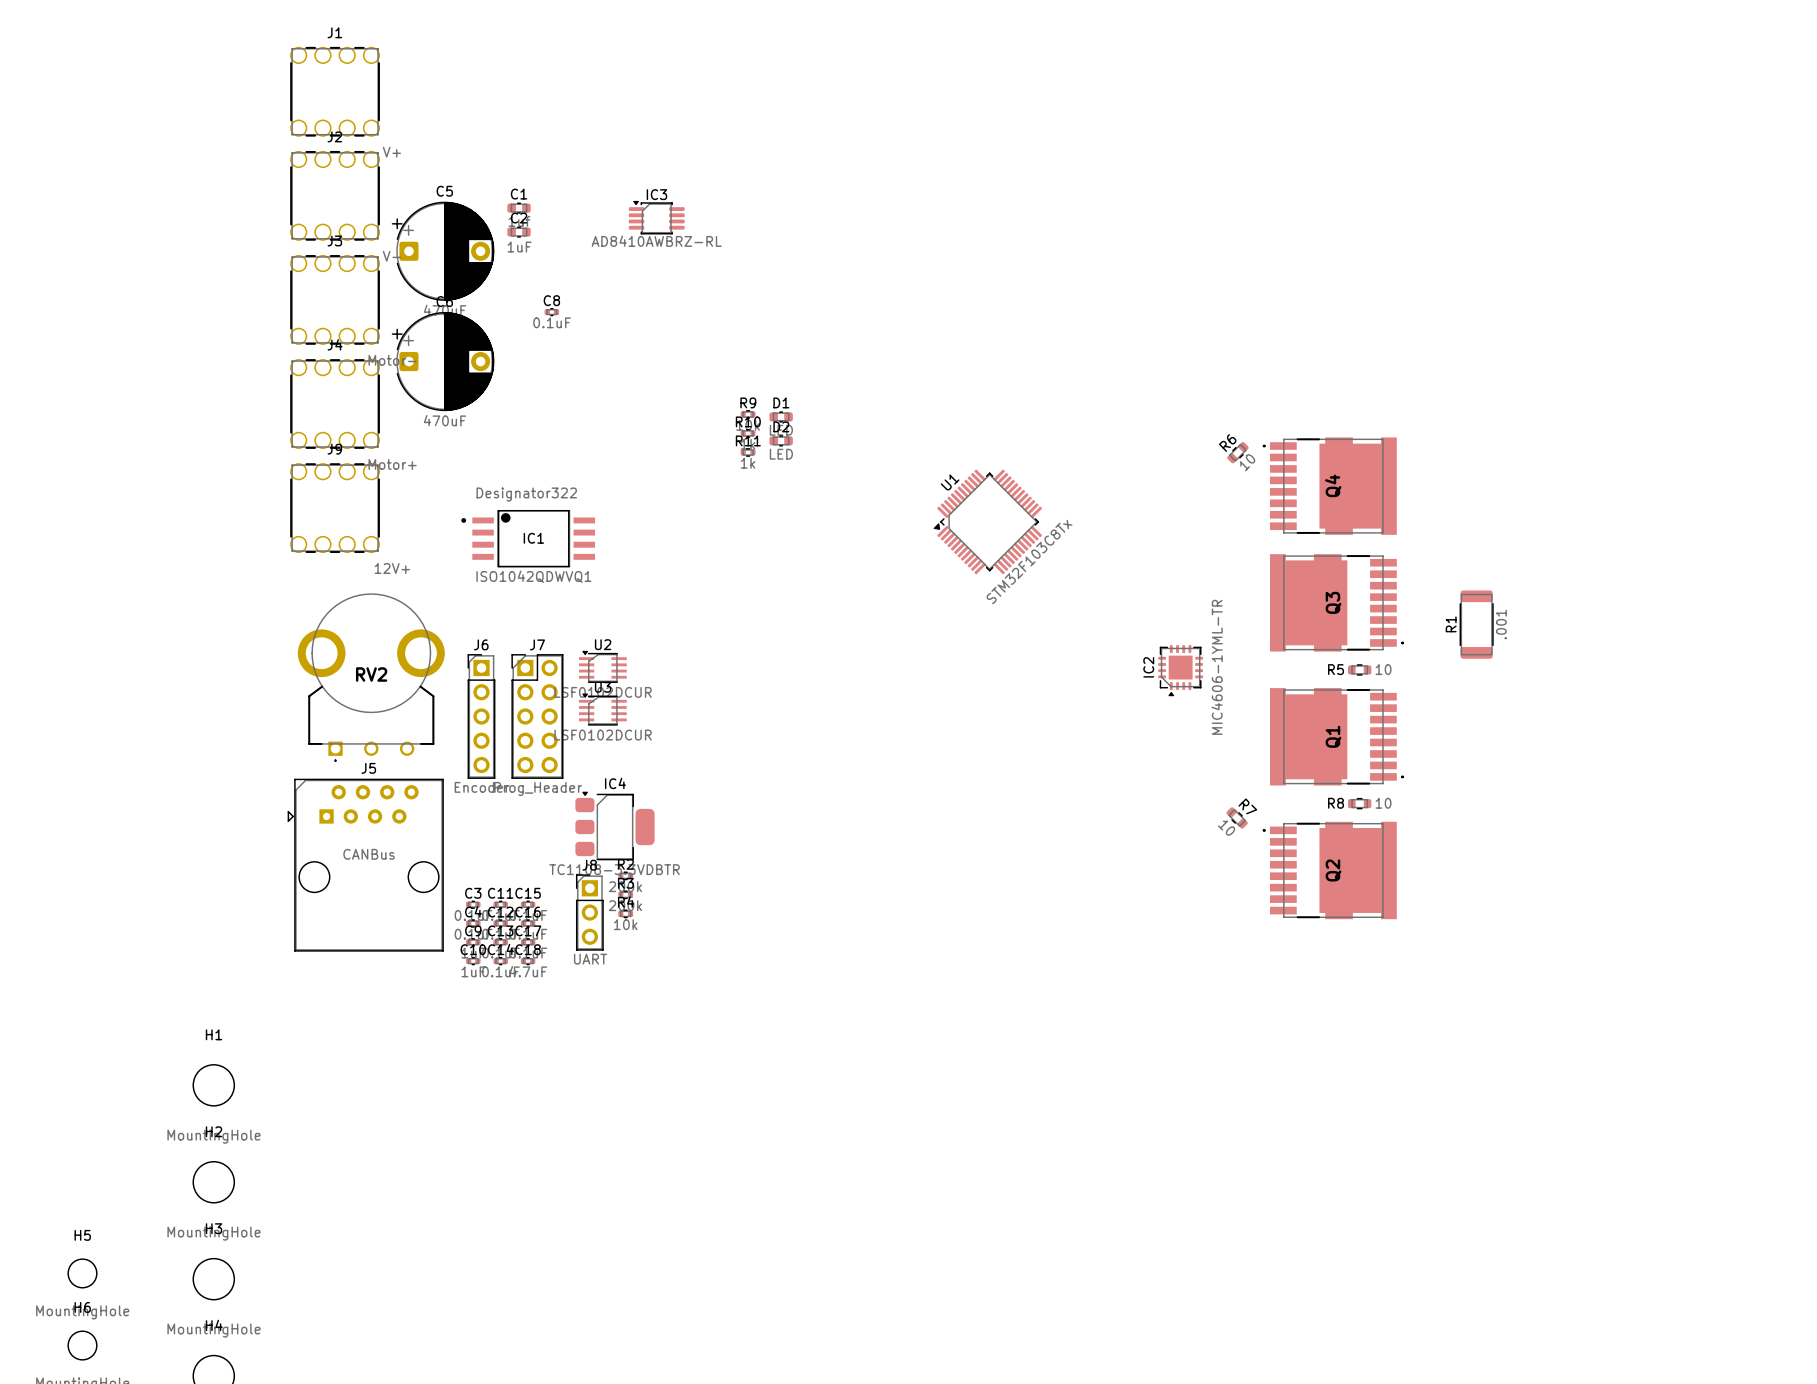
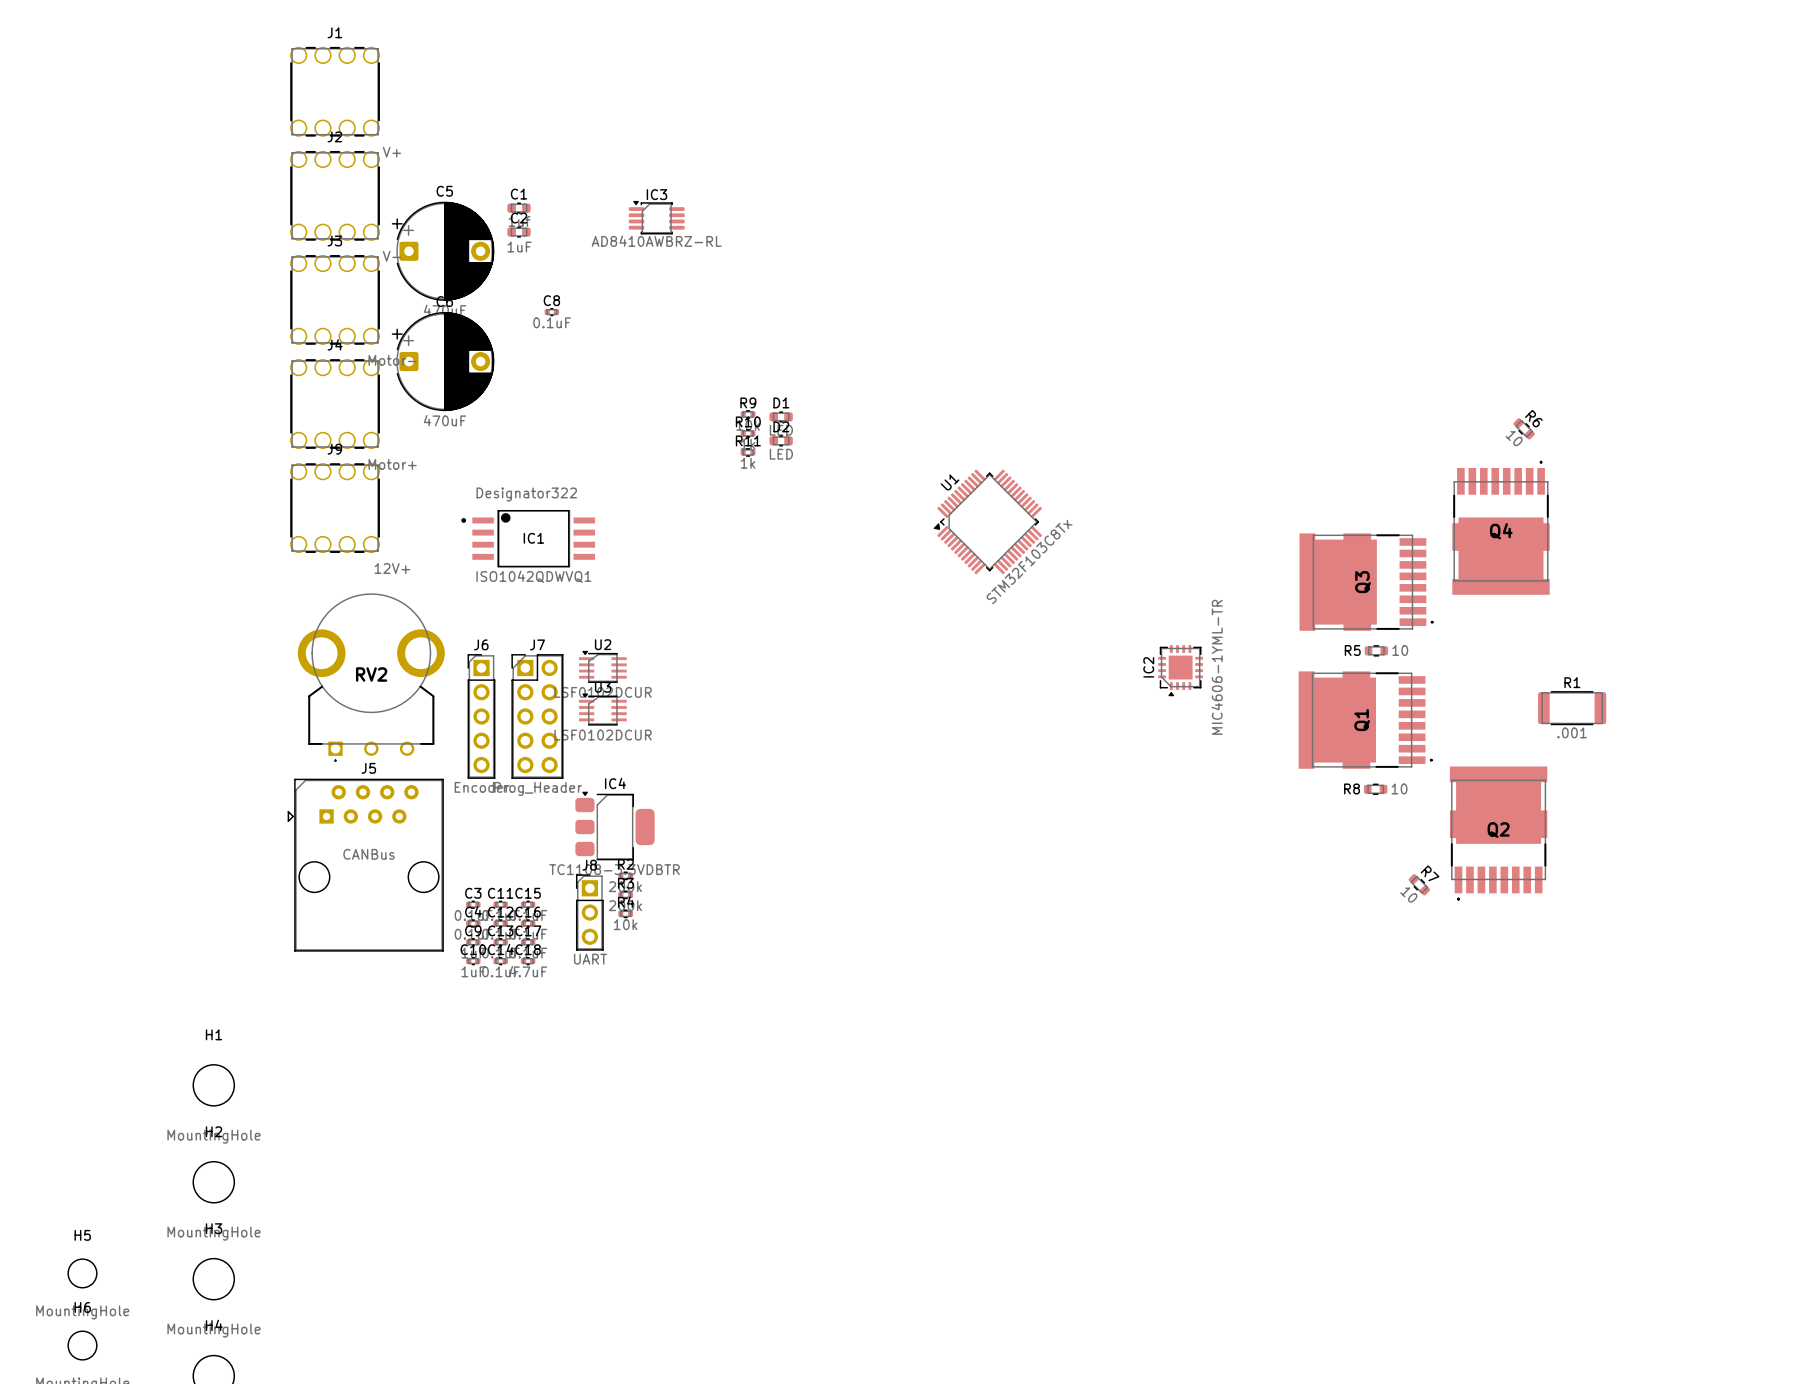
R6 rotation: 0° (1237, 452) -> 90° clockwise (1524, 428)
R6 position: (1237, 452) -> (1524, 428)
Q4 rotation: 0° (1329, 486) -> 90° clockwise (1500, 527)
Q4 position: (1329, 486) -> (1500, 527)
Q3 position: (1337, 602) -> (1366, 582)
R1 rotation: 0° (1476, 624) -> 90° clockwise (1572, 708)
R1 position: (1476, 624) -> (1572, 708)
R5 position: (1359, 669) -> (1376, 650)
Q1 position: (1337, 736) -> (1365, 720)
R8 position: (1359, 803) -> (1375, 789)
R7 position: (1237, 817) -> (1419, 884)
Q2 rotation: 0° (1329, 870) -> 90° counterclockwise (1498, 833)
Q2 position: (1329, 870) -> (1498, 833)

